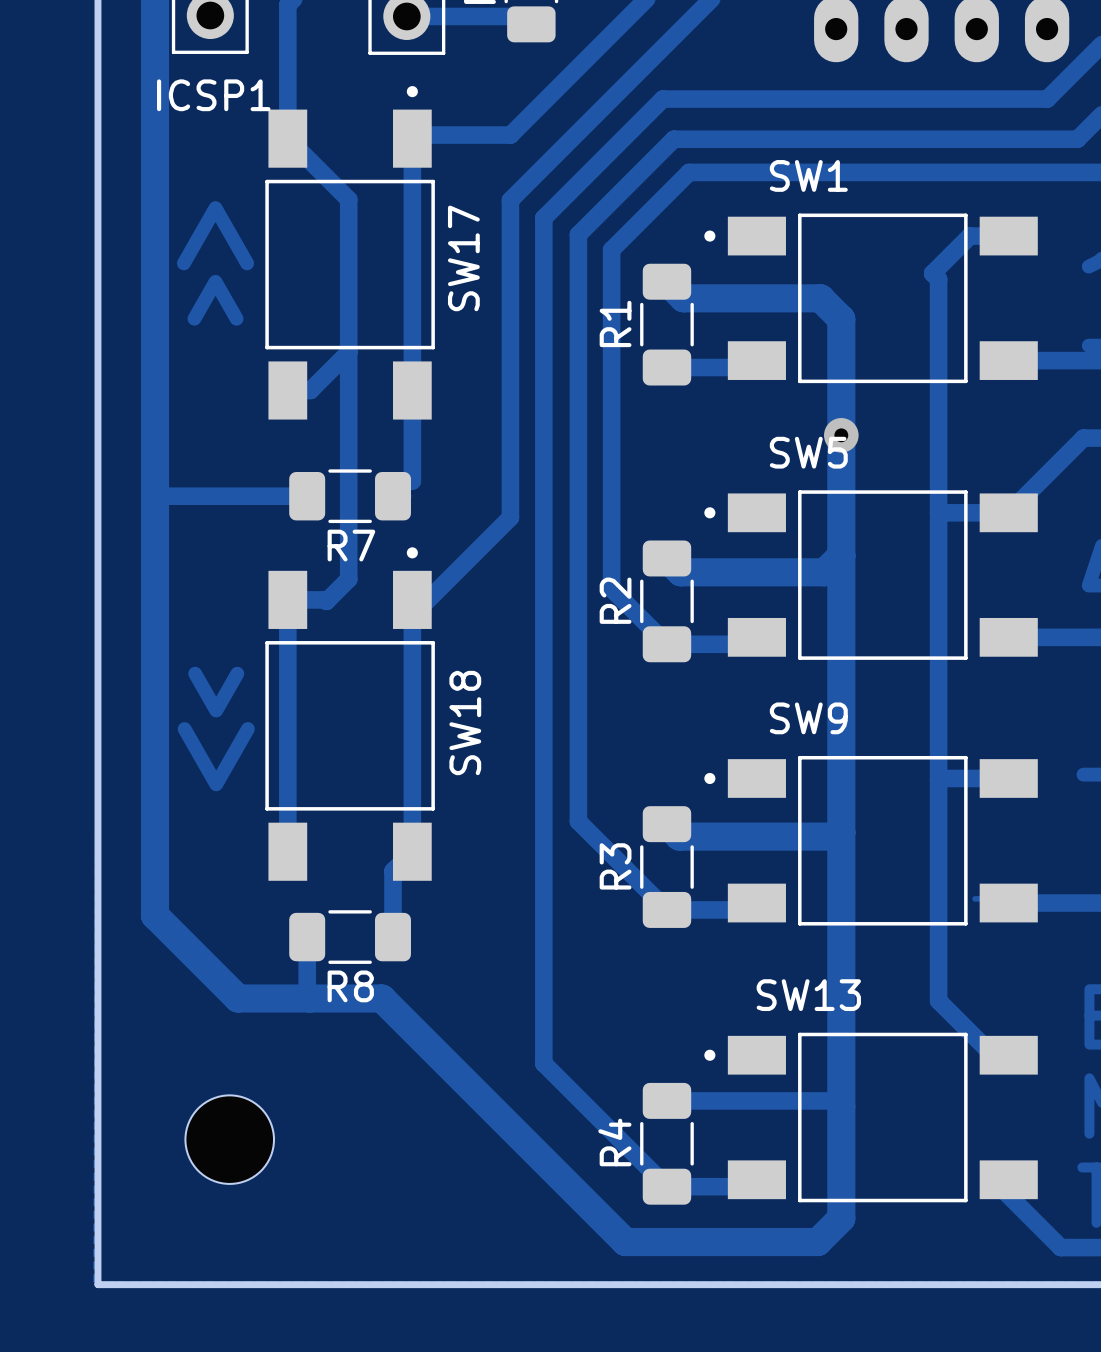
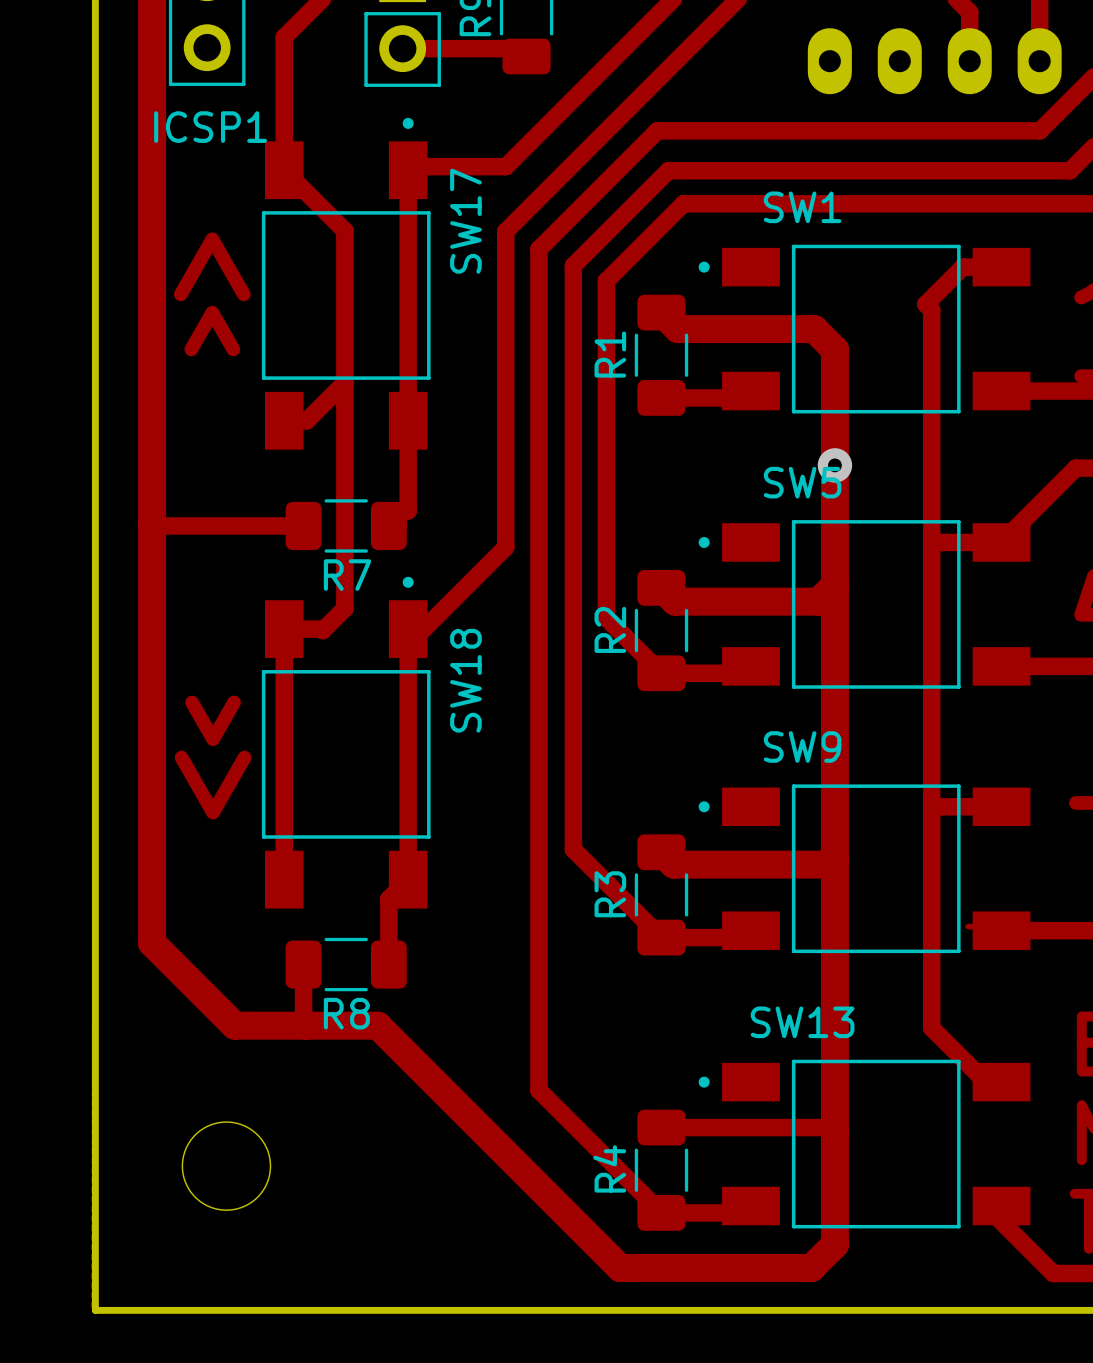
SW17 name position: SW17 (463, 258) -> SW17 (465, 221)
SW18 name position: SW18 (465, 723) -> SW18 (465, 680)

